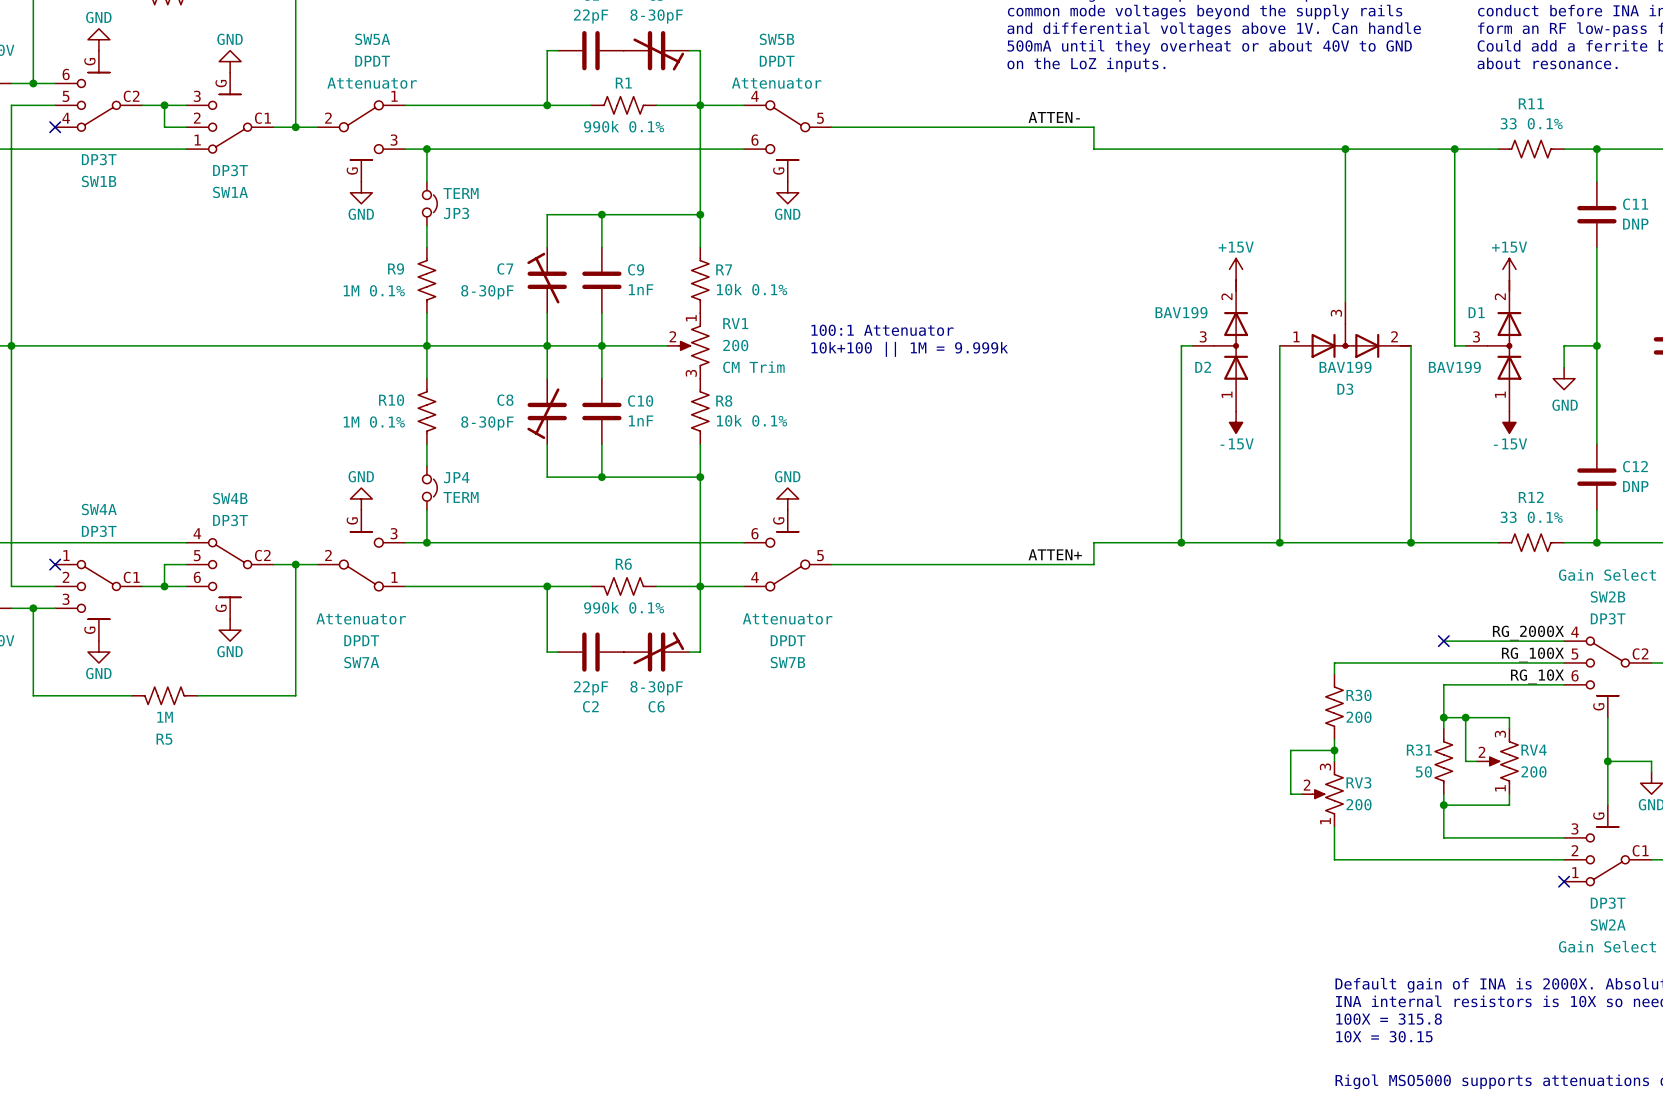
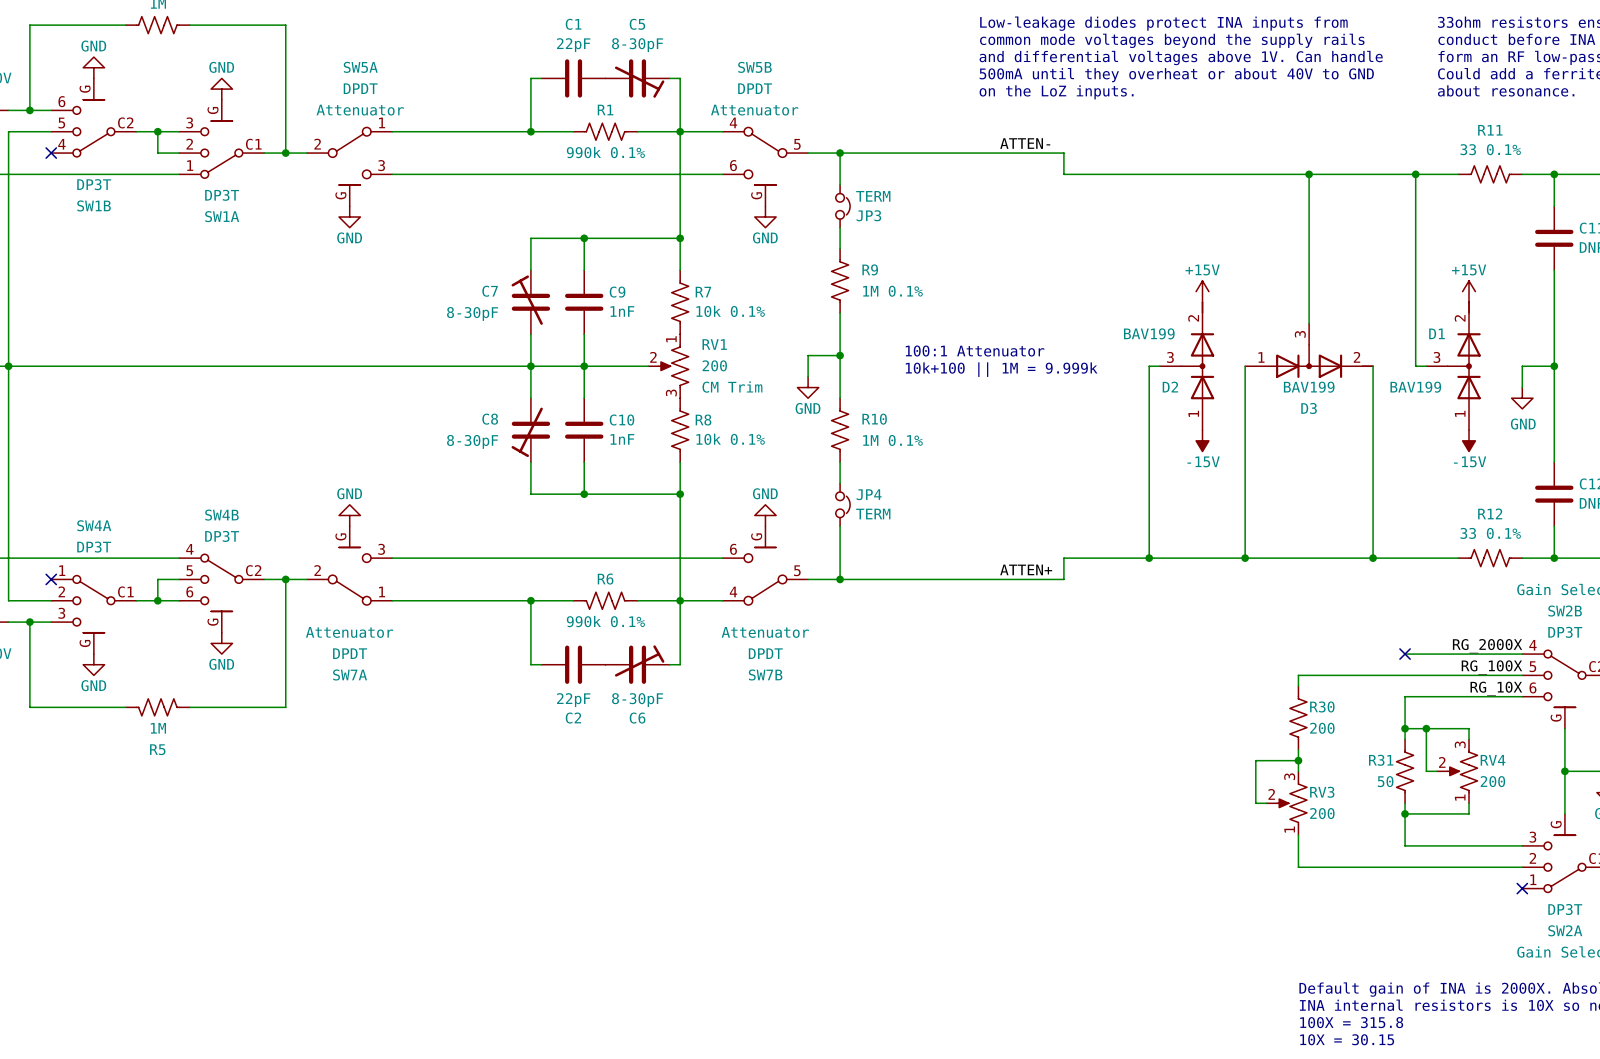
wire: none -> (840, 153) (840, 185)
junction: none -> (840, 153)
wire: (426, 149) (426, 181) -> none
junction: (426, 149) -> none
JP3 position: (429, 203) -> (842, 206)
wire: none -> (840, 227) (840, 248)
wire: (426, 225) (426, 247) -> none
R9 flip: as is (426, 280) -> left-right (840, 280)
R9 position: (426, 280) -> (840, 280)
wire: none -> (840, 312) (840, 398)
wire: (426, 313) (426, 378) -> none
text position: 100:1 Attenuator (882, 330) -> 100:1 Attenuator (975, 351)
wire: none -> (840, 355) (808, 355) (808, 376)
junction: none -> (840, 355)
junction: (426, 345) -> none
text position: 10k+100 || 1M = 9.999k (909, 349) -> 10k+100 || 1M = 9.999k (1001, 369)
power symbol: none -> GND (808, 387)
R10 flip: as is (426, 411) -> left-right (840, 430)
R10 position: (426, 411) -> (840, 430)
wire: (426, 444) (426, 466) -> none
wire: none -> (840, 462) (840, 483)
JP4 position: (429, 488) -> (842, 504)
wire: (426, 509) (426, 542) -> none
wire: none -> (840, 526) (840, 579)
junction: (426, 542) -> none
junction: none -> (840, 579)

